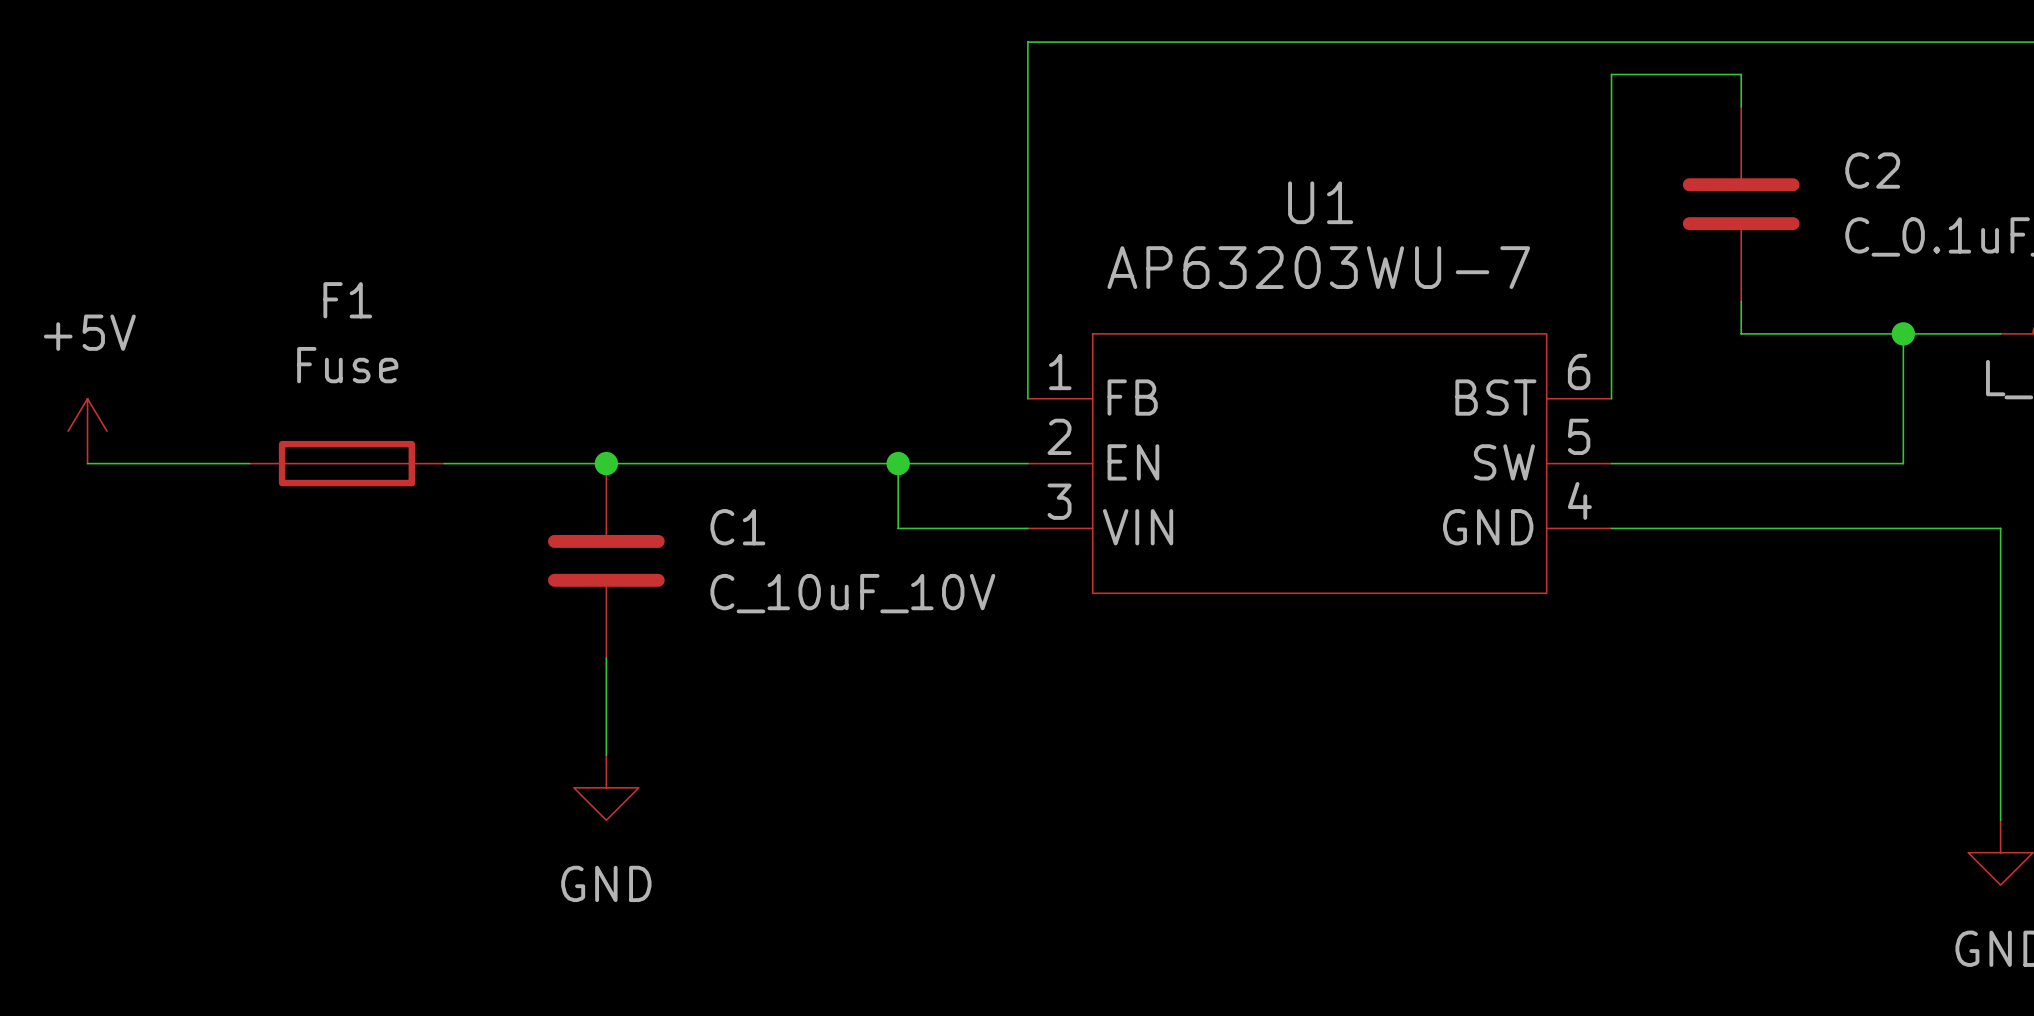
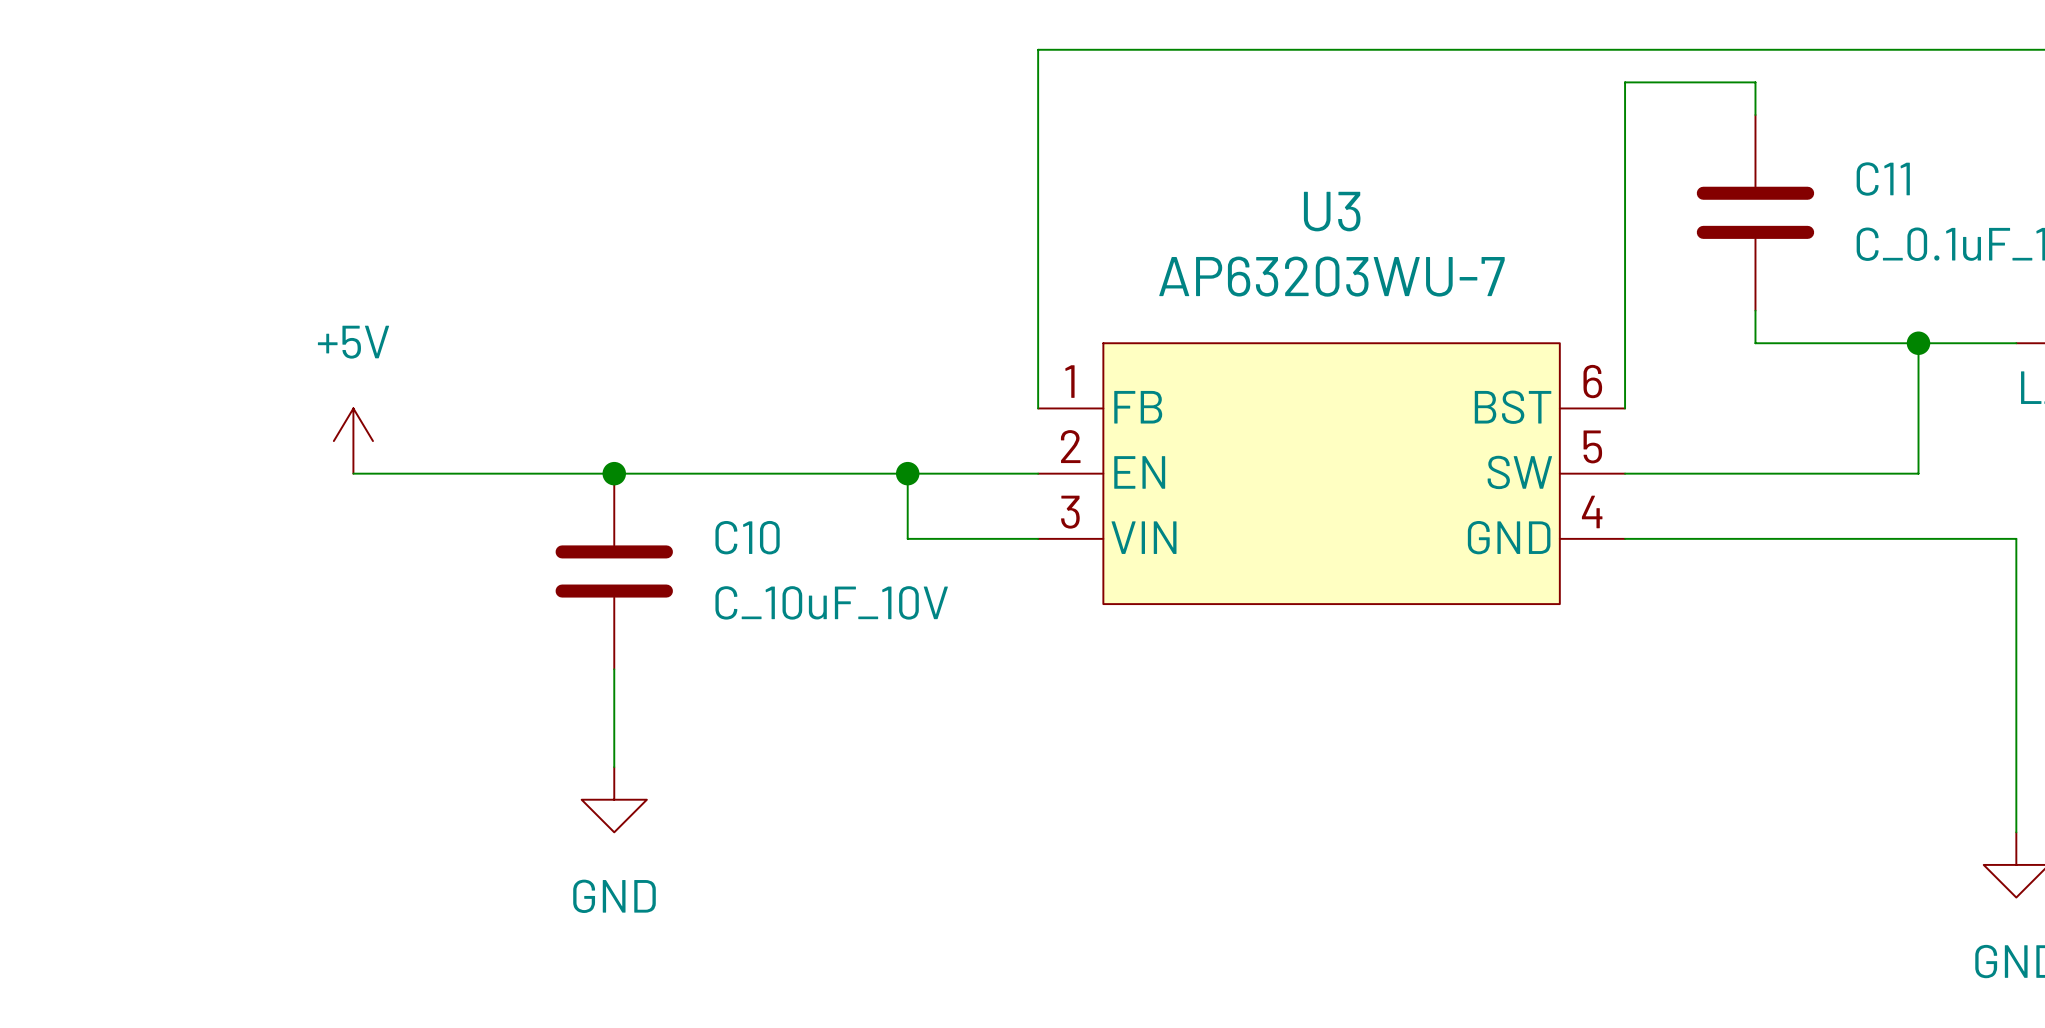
C2 name: C2 (1872, 170) -> C11 (1883, 179)
U1 name: U1 (1320, 202) -> U3 (1332, 211)
power symbol position: +5V (87, 431) -> +5V (353, 441)
wire: (87, 463) (249, 463) -> none
F1: Fuse (346, 463) -> none
C1 name: C1 (737, 527) -> C10 (747, 537)

